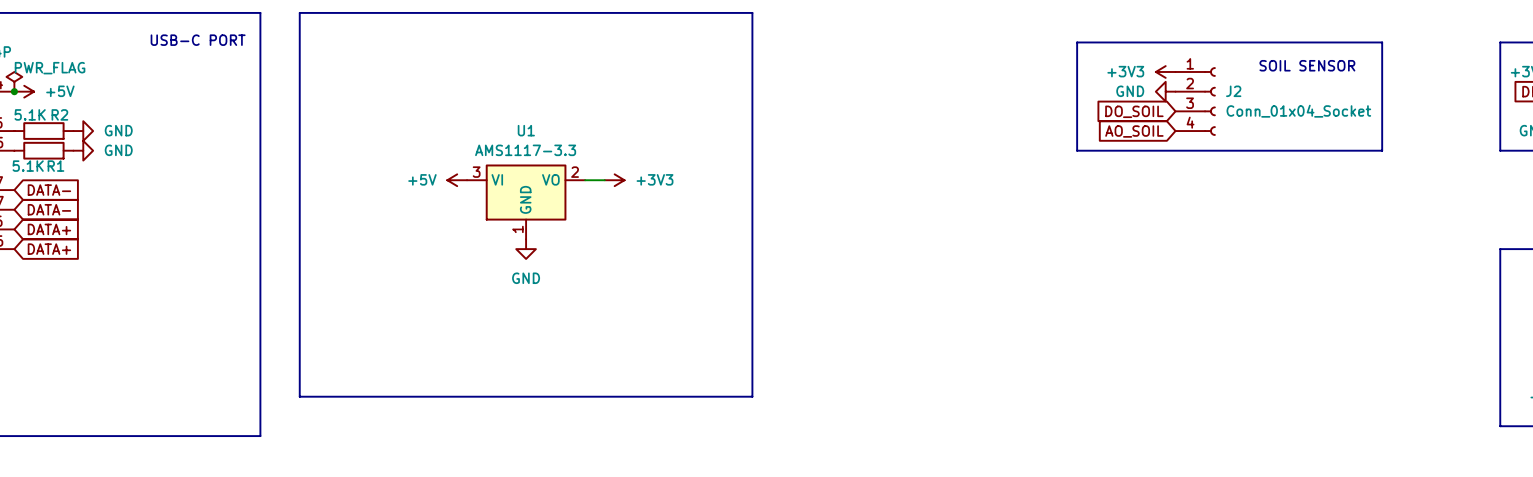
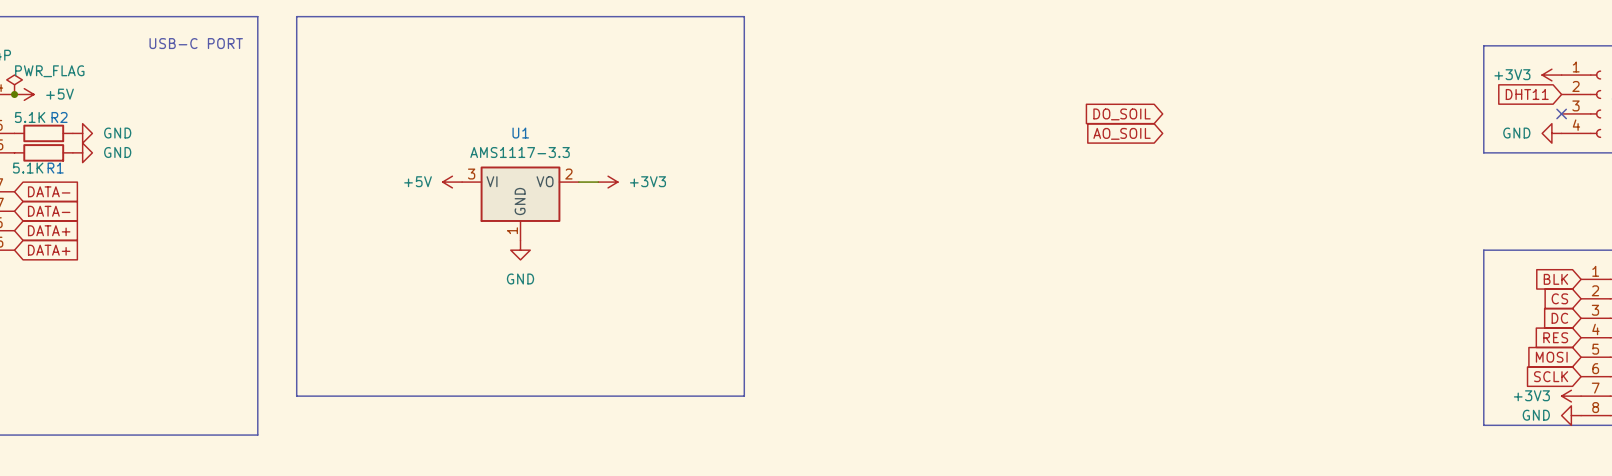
line: (1077, 42) (1382, 42) (1382, 150) (1077, 150) (1077, 42) -> none
text: SOIL SENSOR (1307, 65) -> none
power symbol: +3V3 (1165, 71) -> none
power symbol: GND (1165, 91) -> none
J2: Conn_01x04_Socket (1195, 101) -> none

